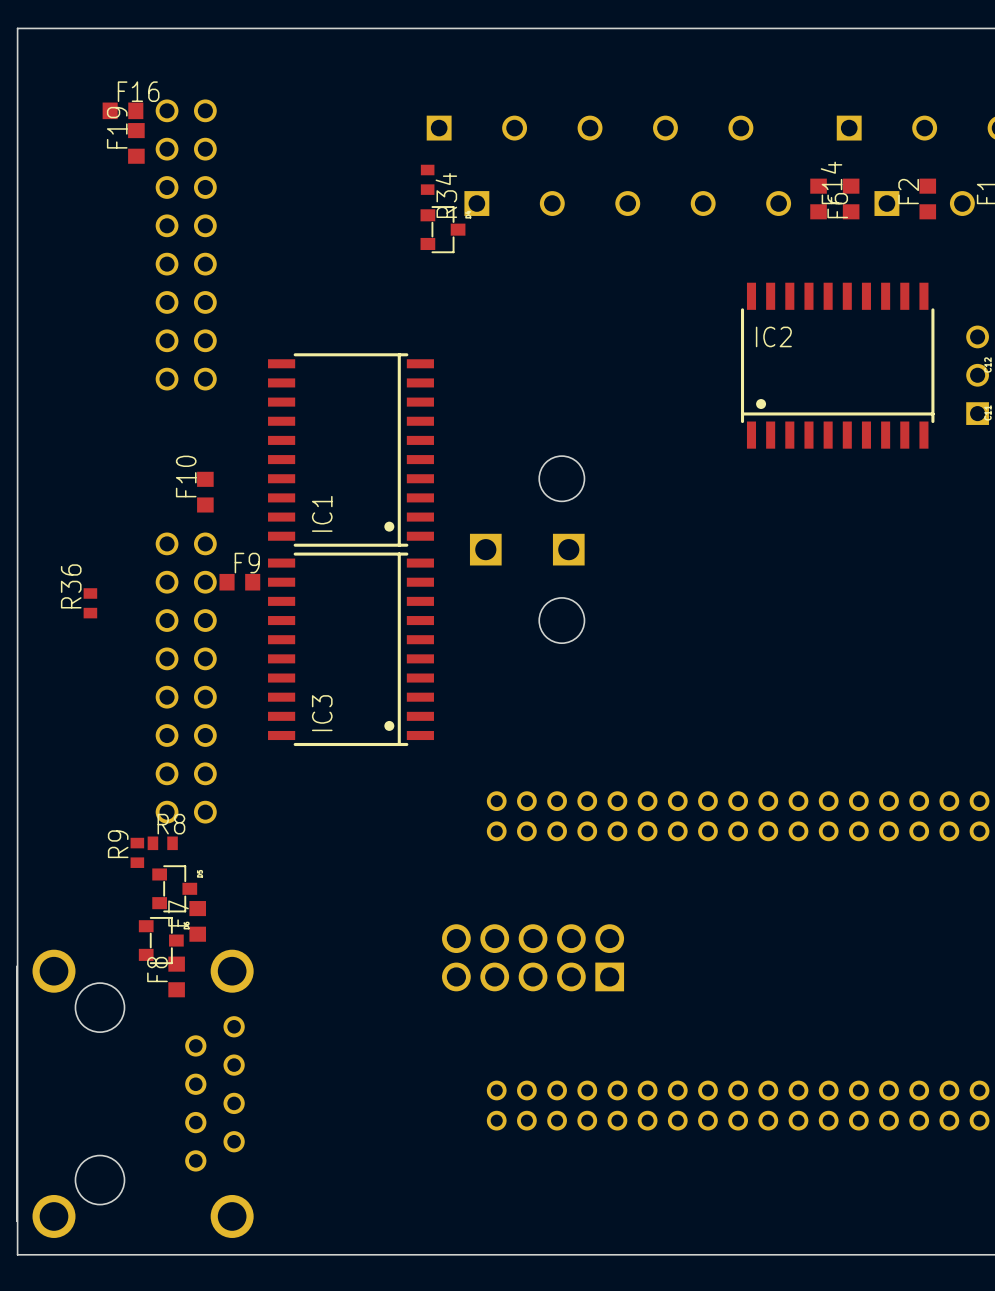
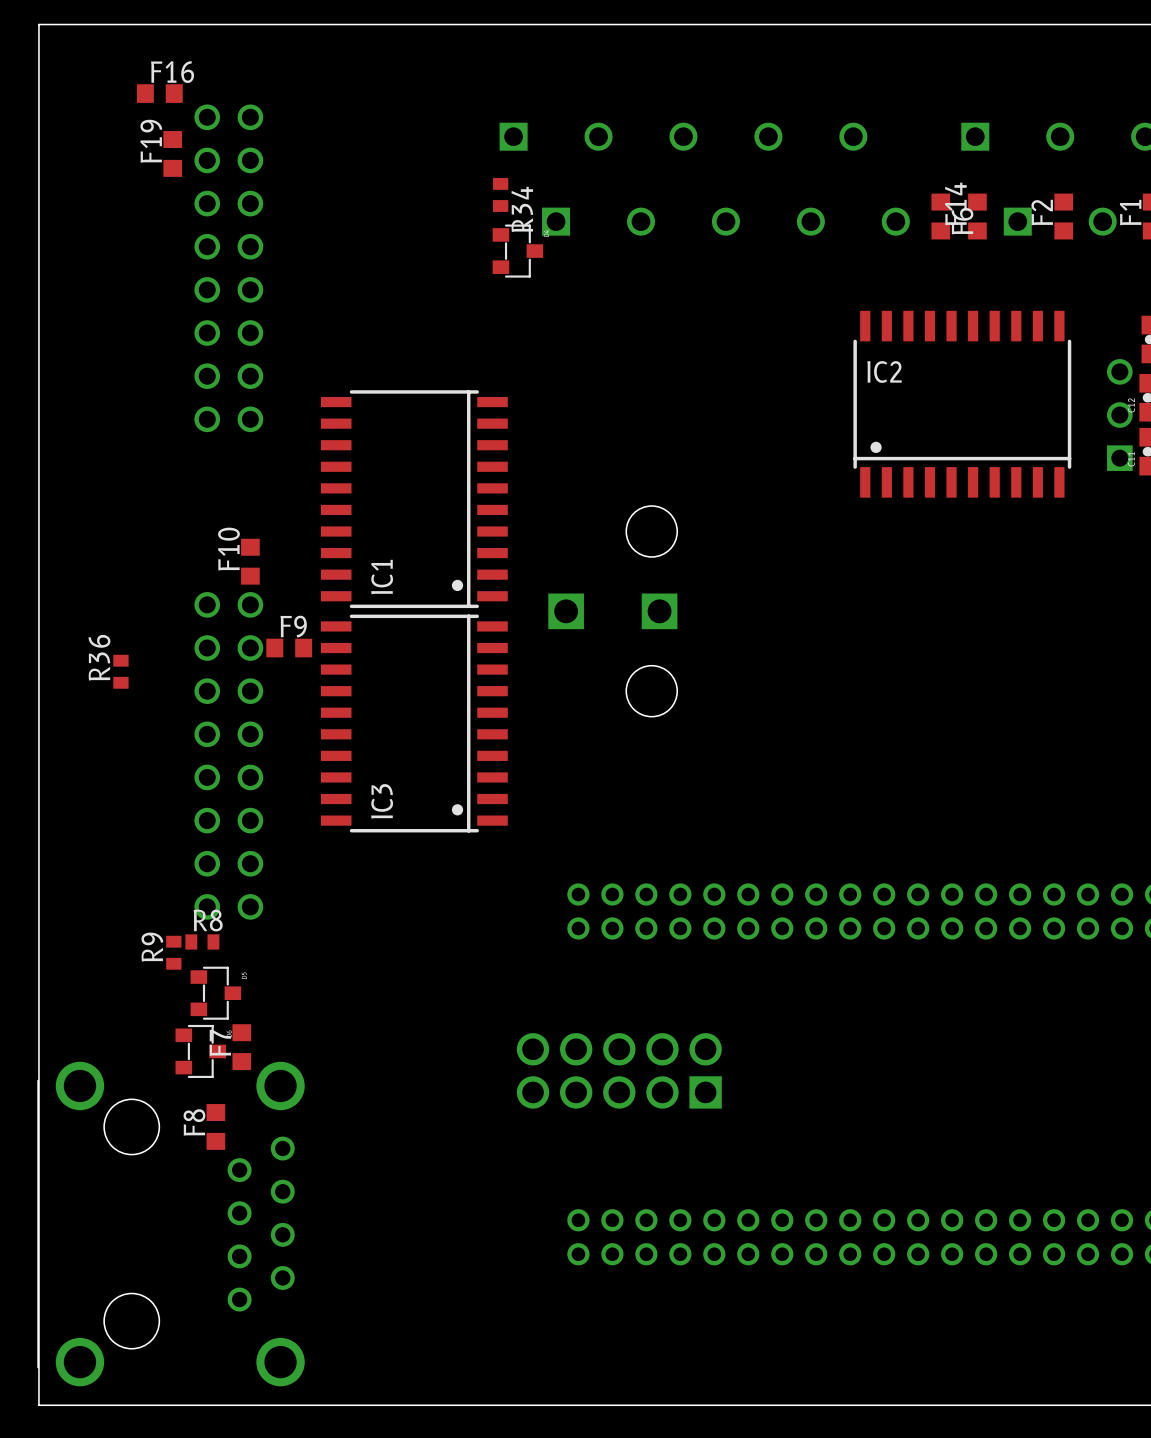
F16 position: (122, 110) -> (159, 93)
F10 position: (205, 492) -> (250, 561)
F7 position: (197, 921) -> (241, 1047)
F8 position: (176, 976) -> (215, 1126)

